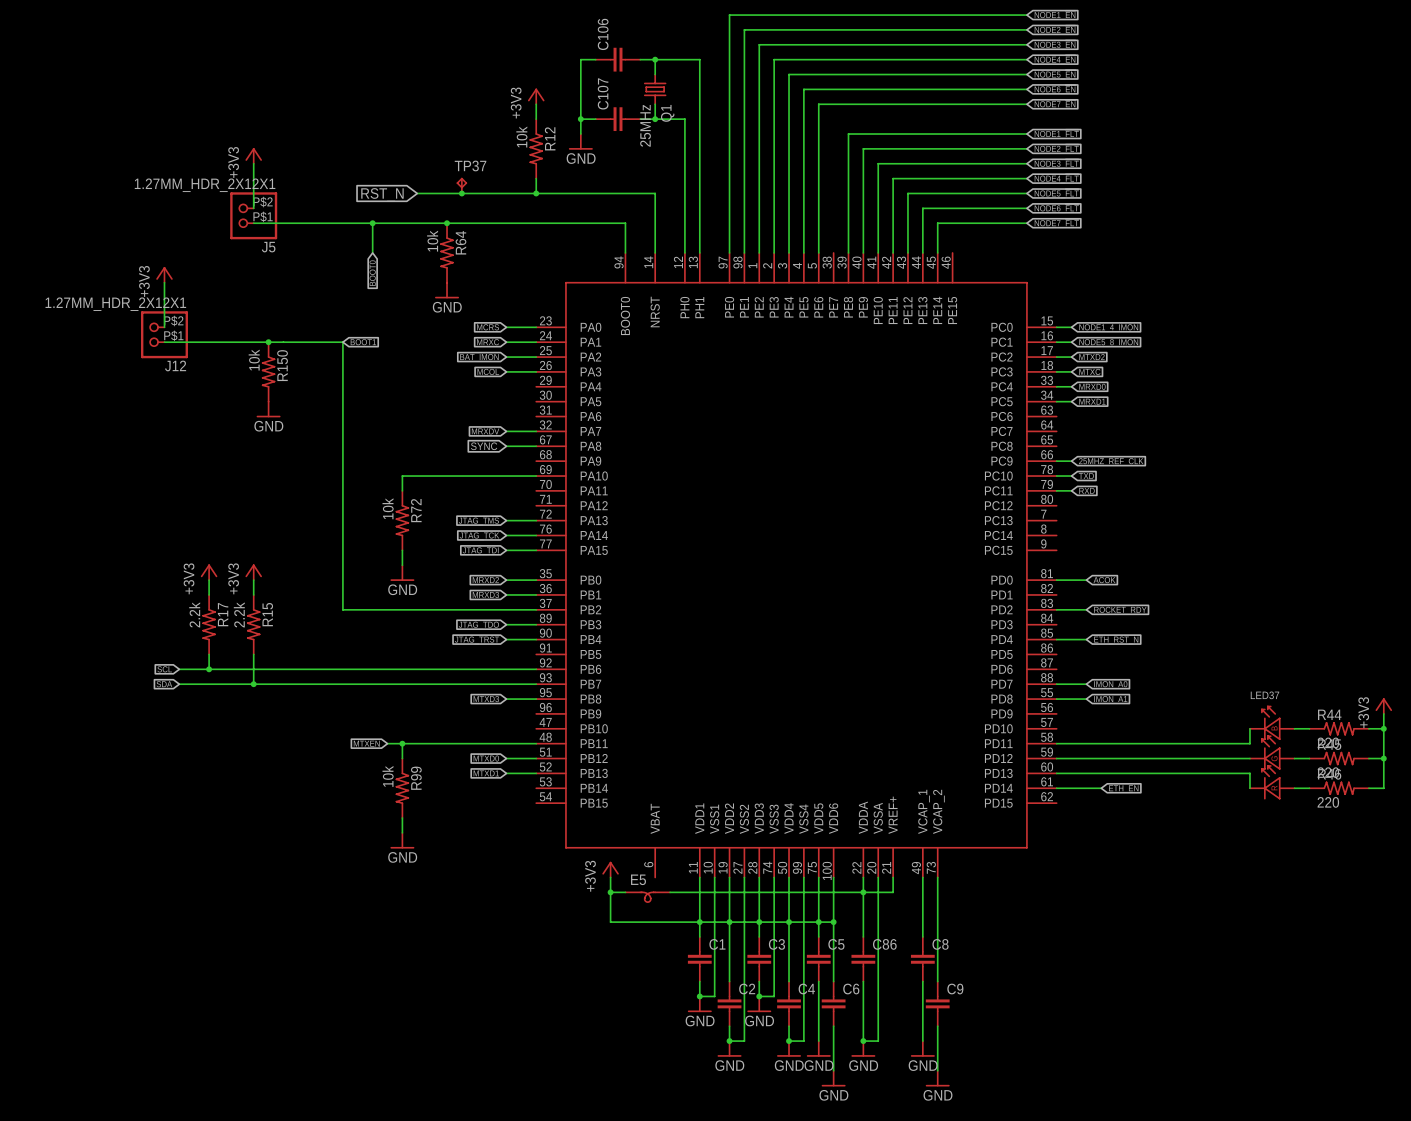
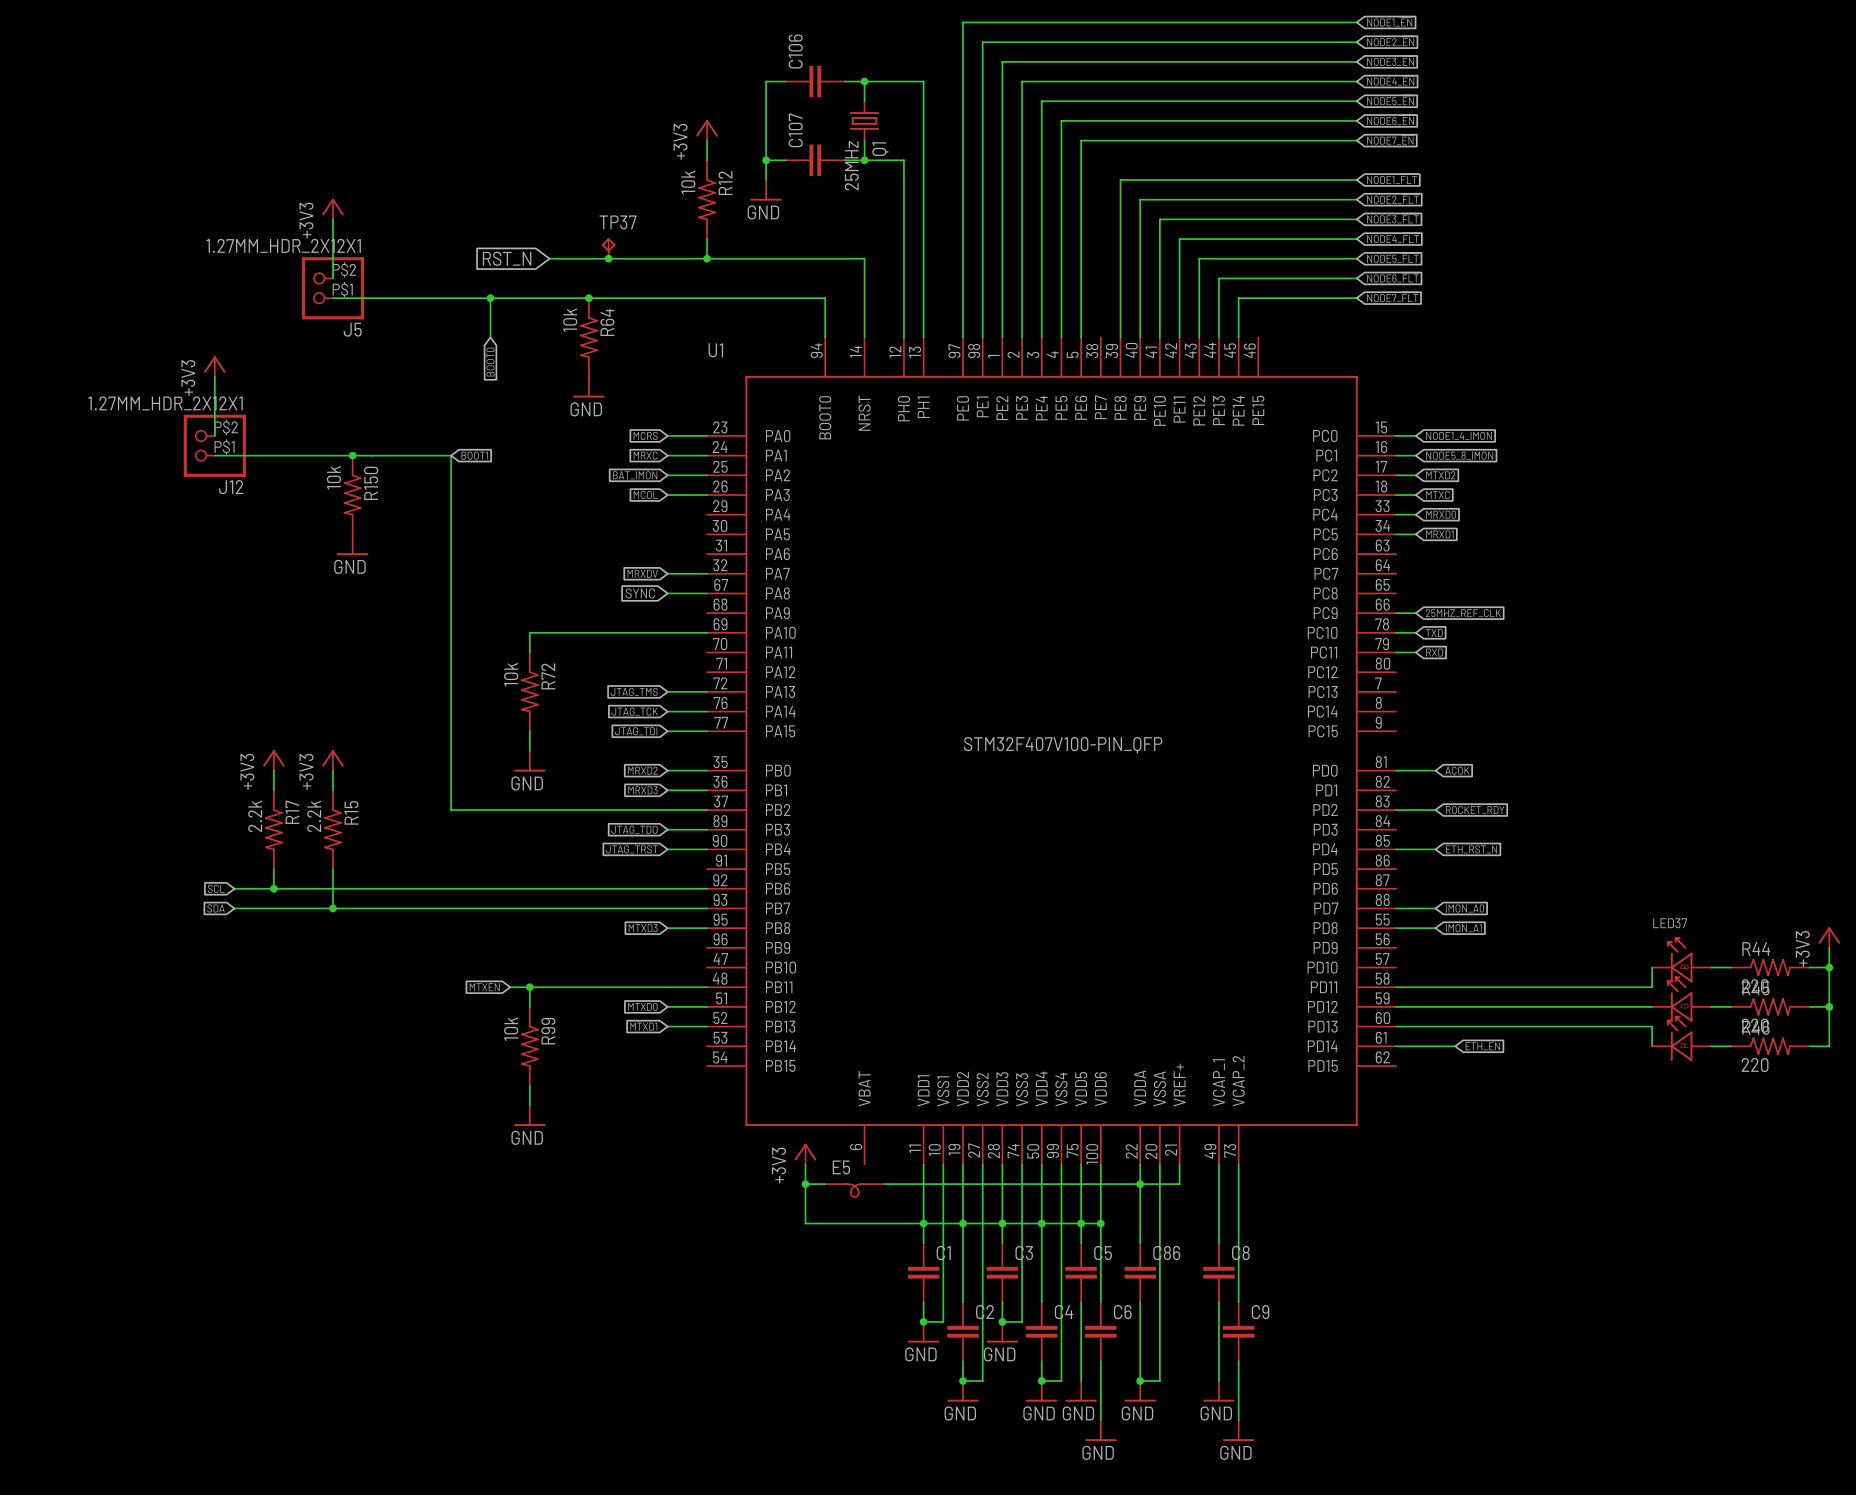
U1 name: none -> U1 (715, 350)
U1 value: none -> STM32F407V100-PIN_QFP (1063, 745)

